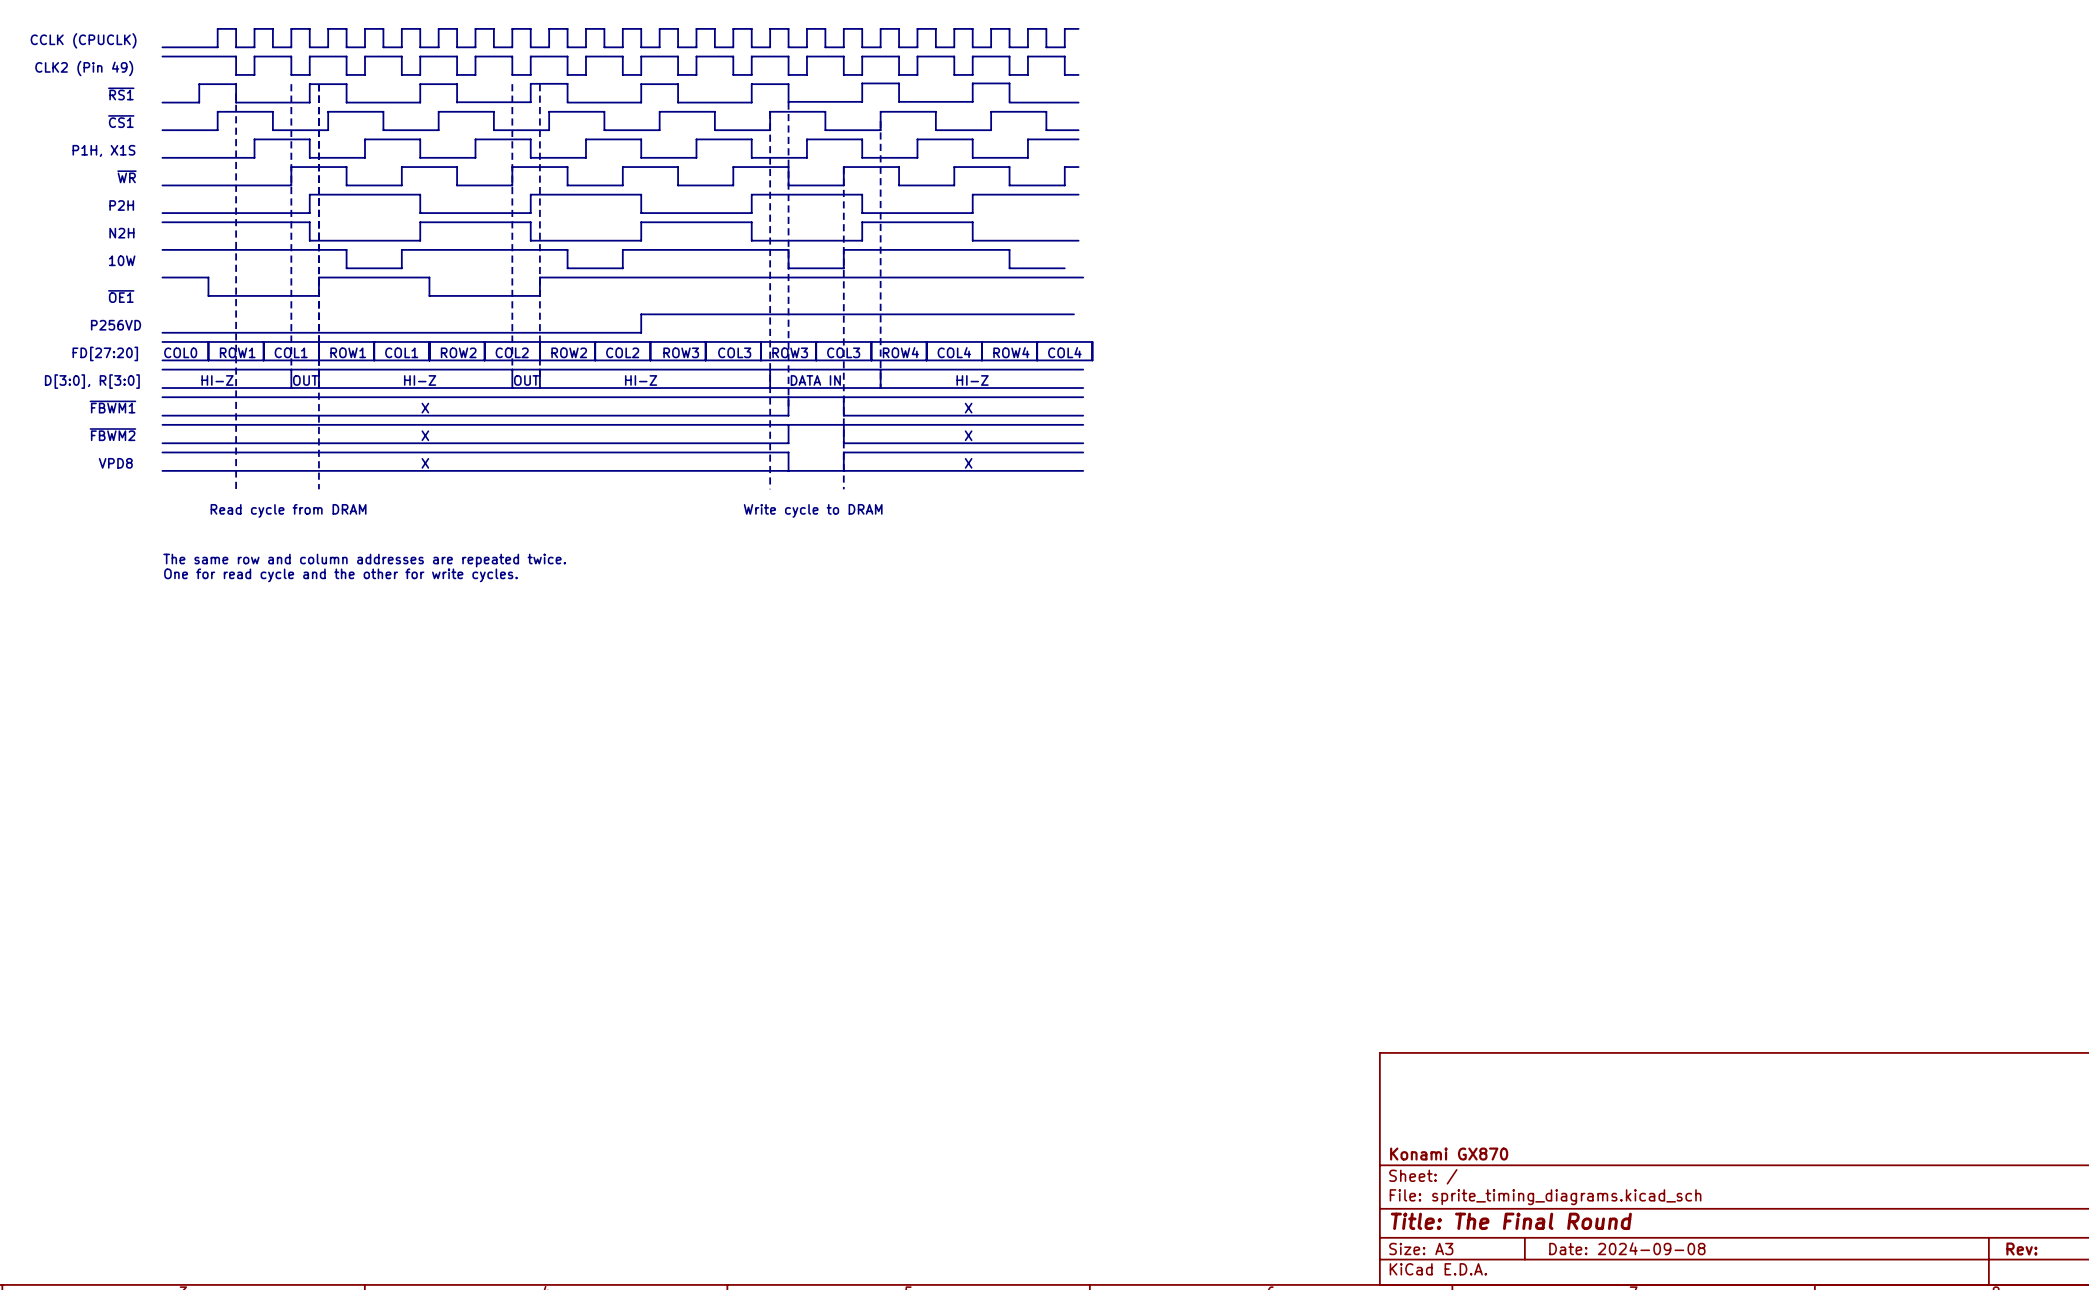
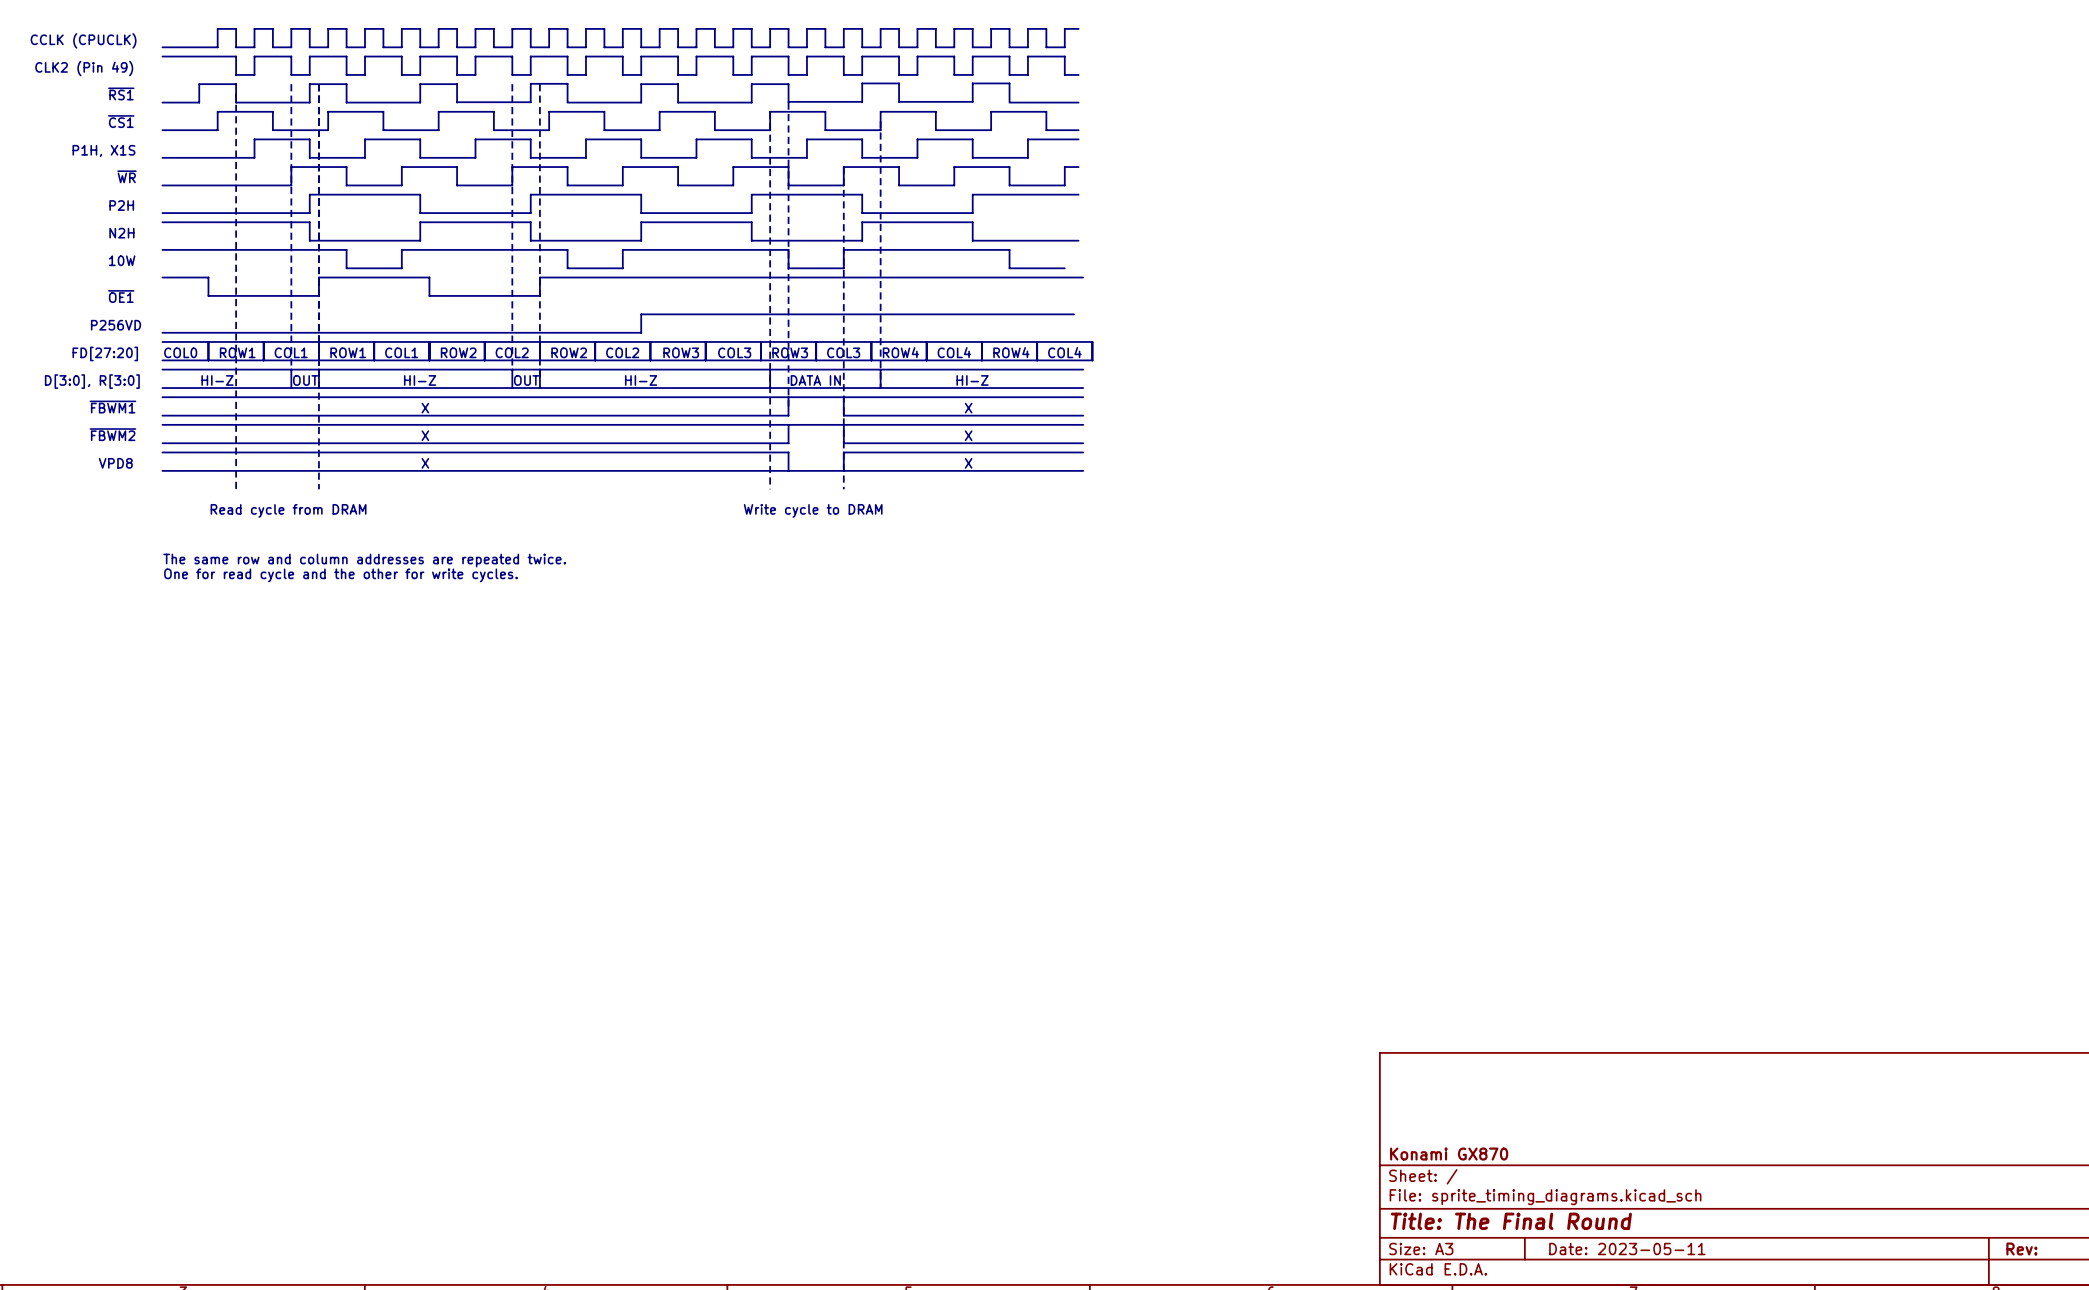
title block: Date: 2024-09-08 (1627, 1248) -> Date: 2023-05-11 (1627, 1249)

